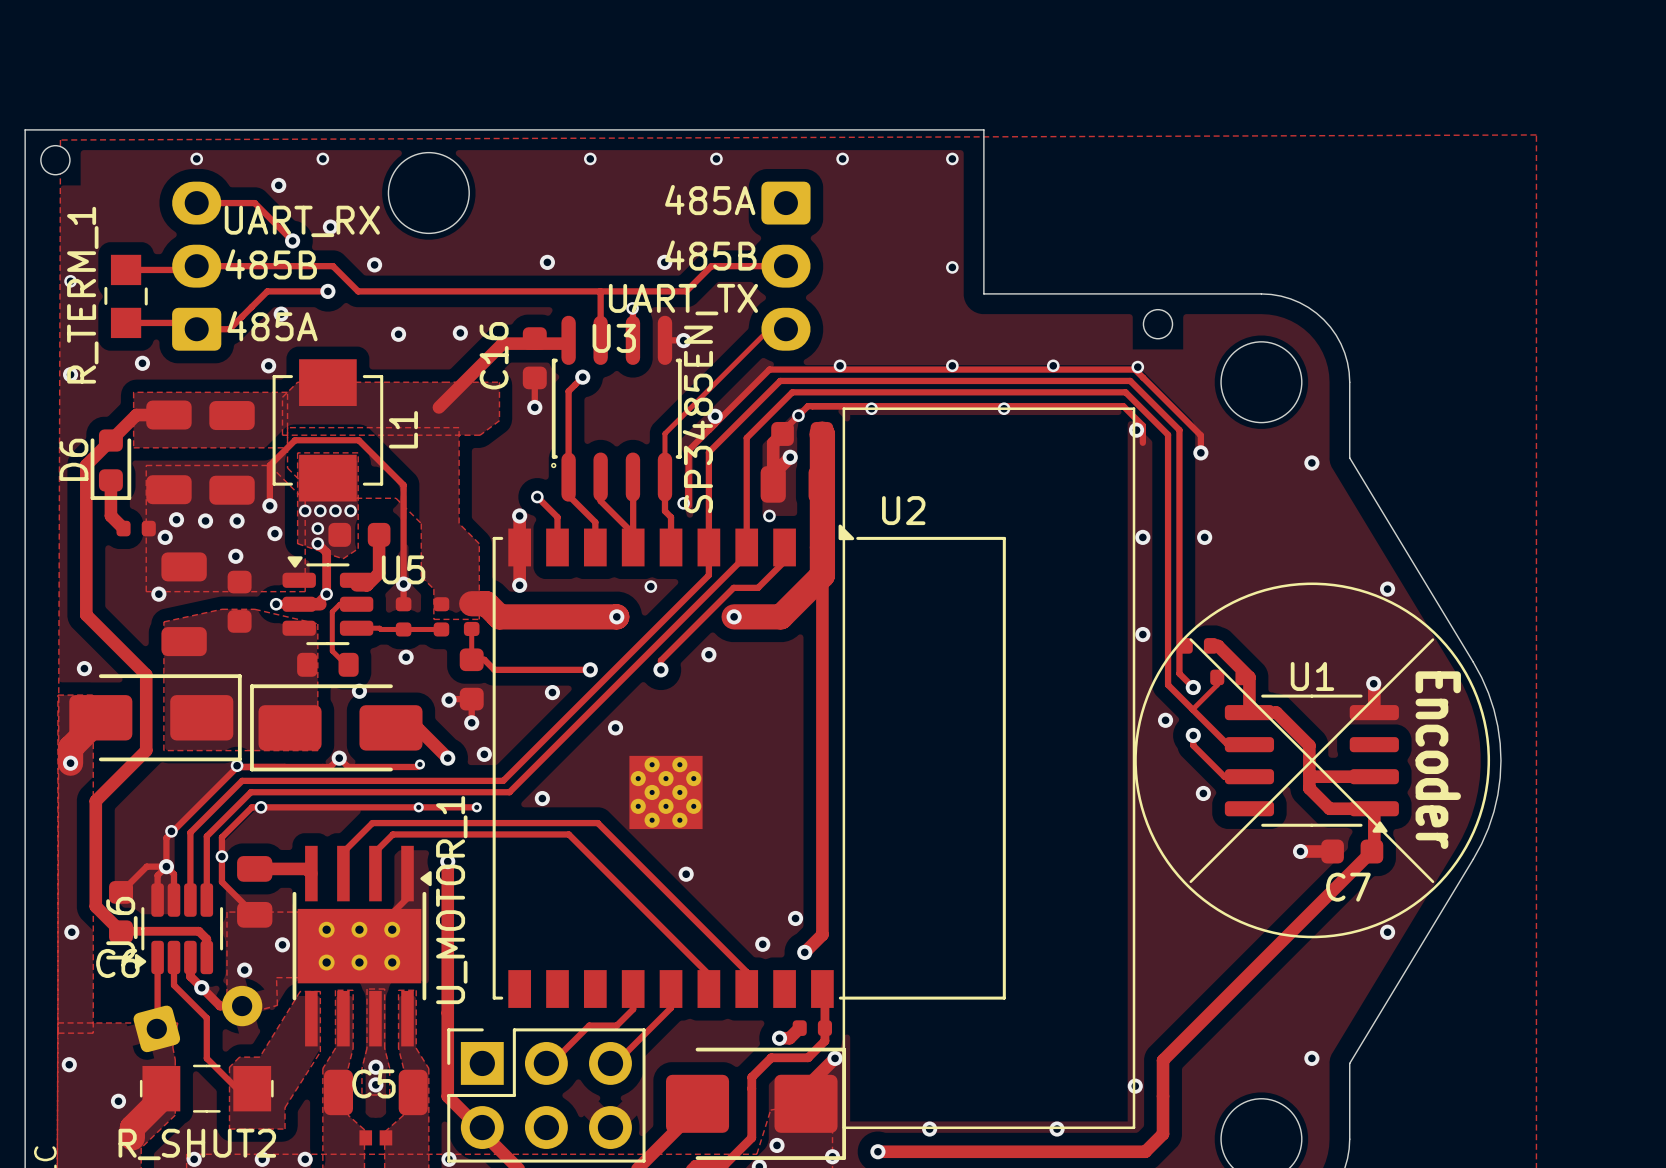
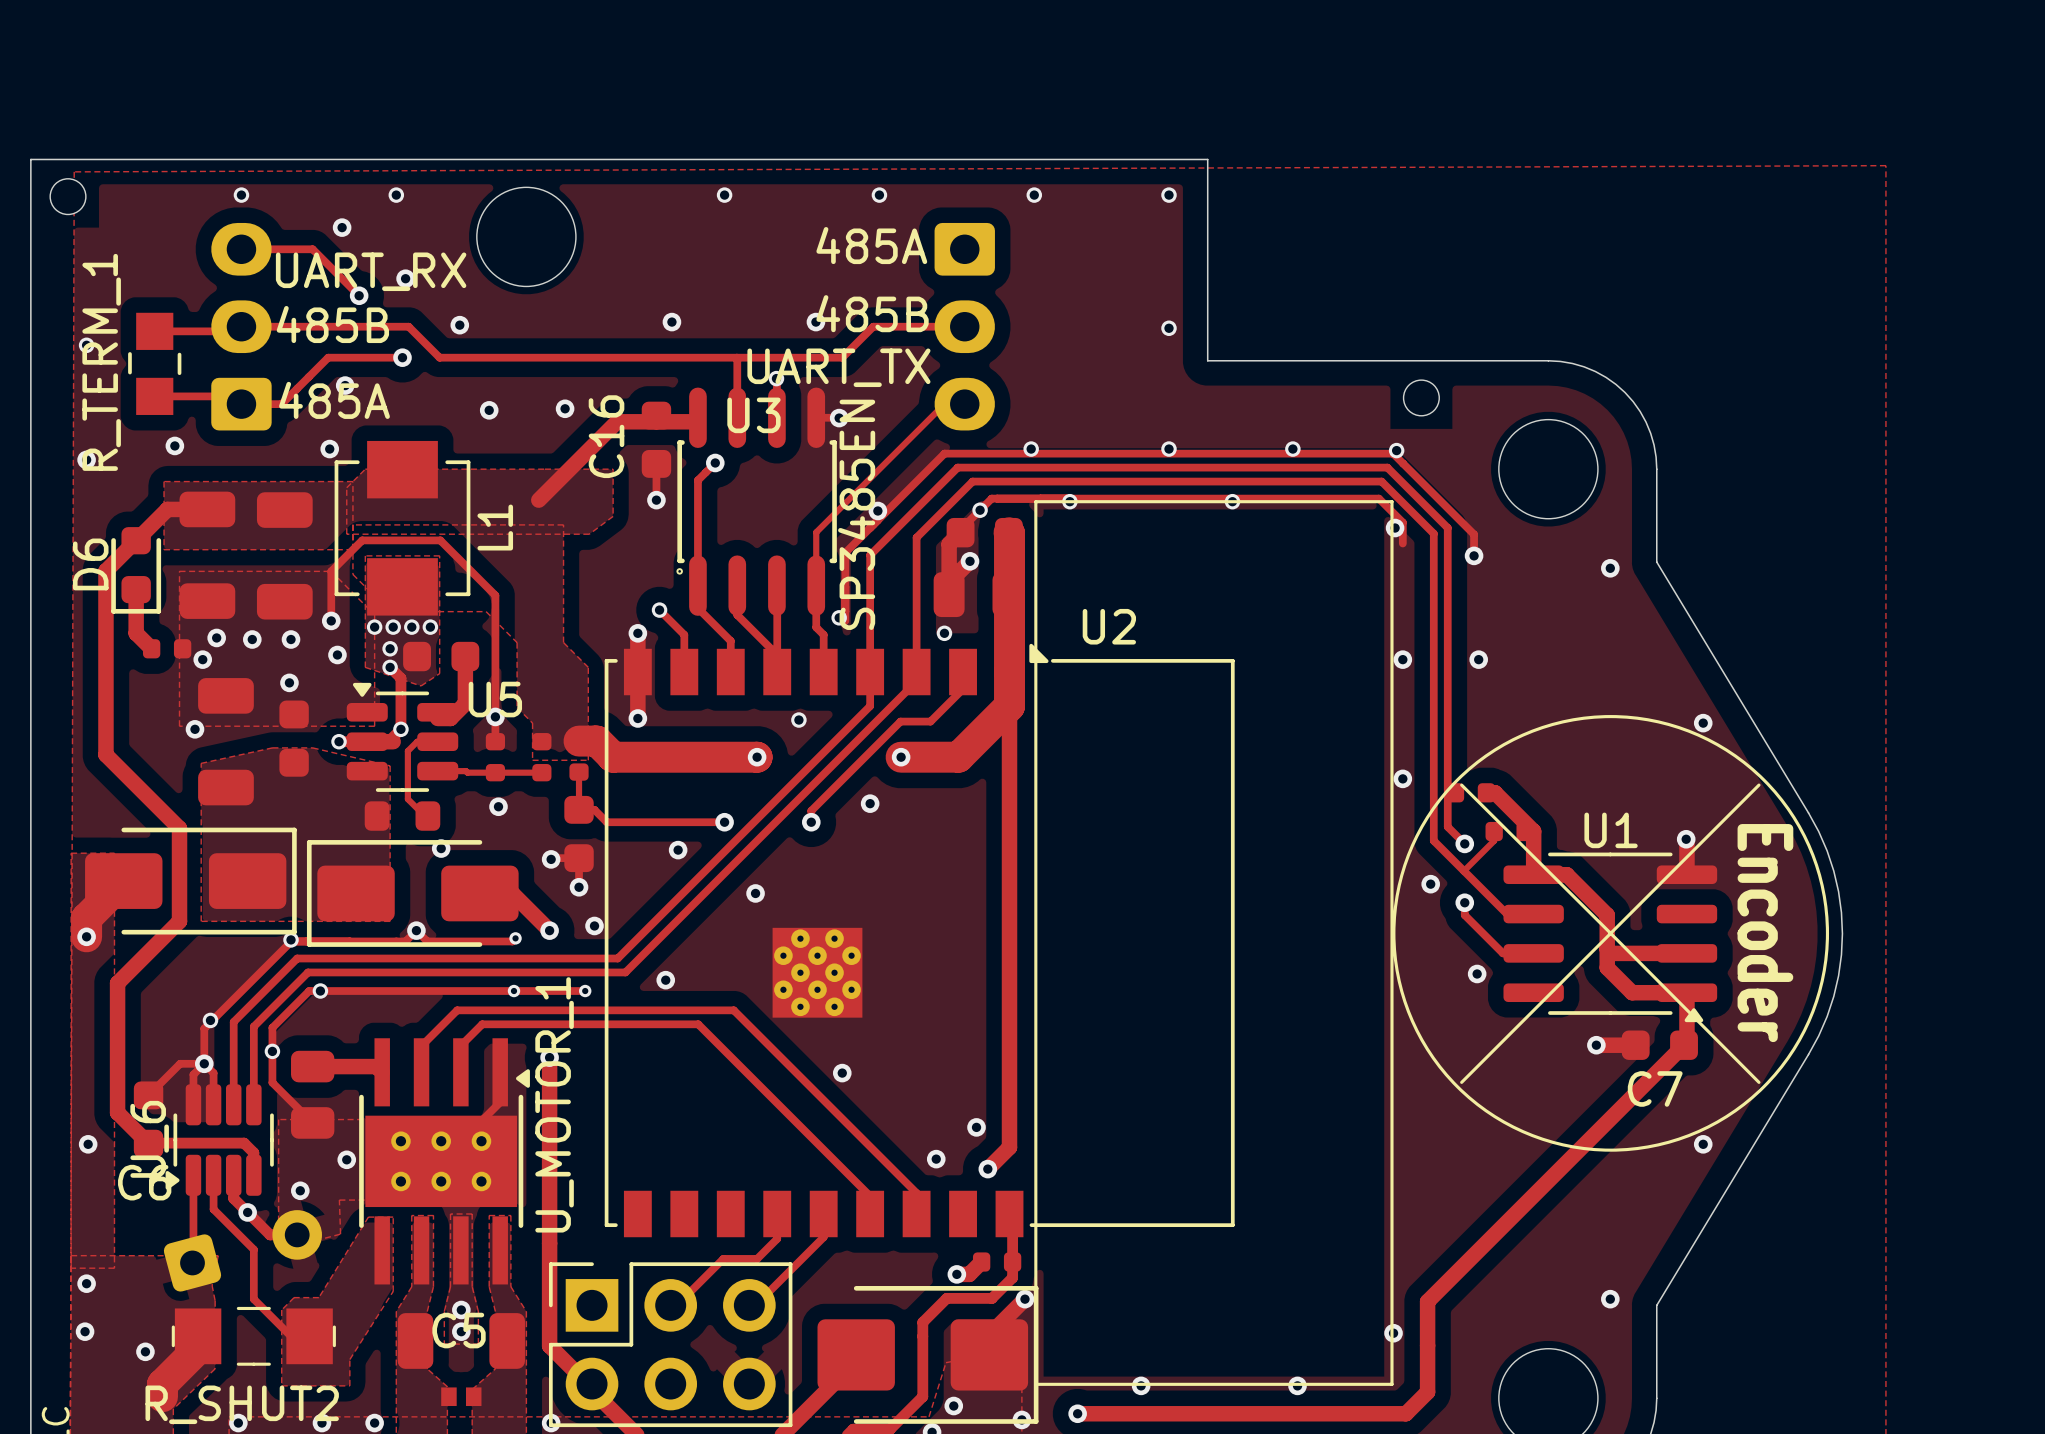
via: (84, 668) -> none
via: none -> (86, 1283)
via: (69, 1064) -> none
via: none -> (85, 1331)

